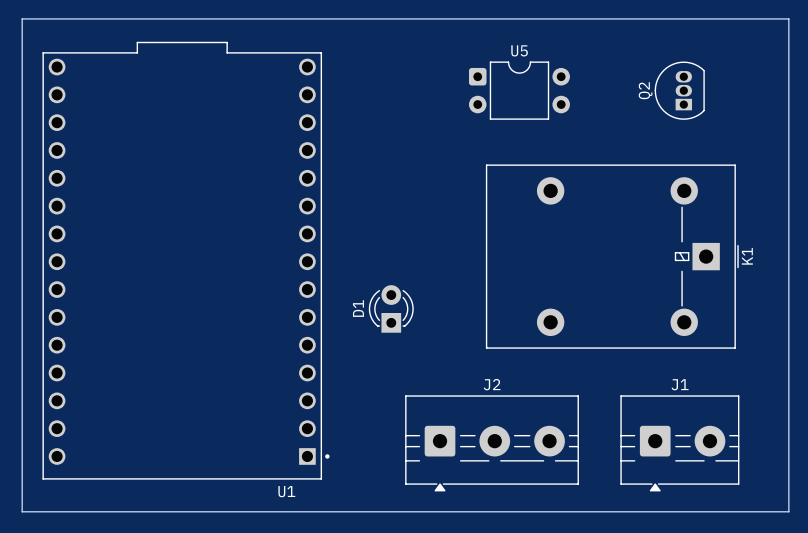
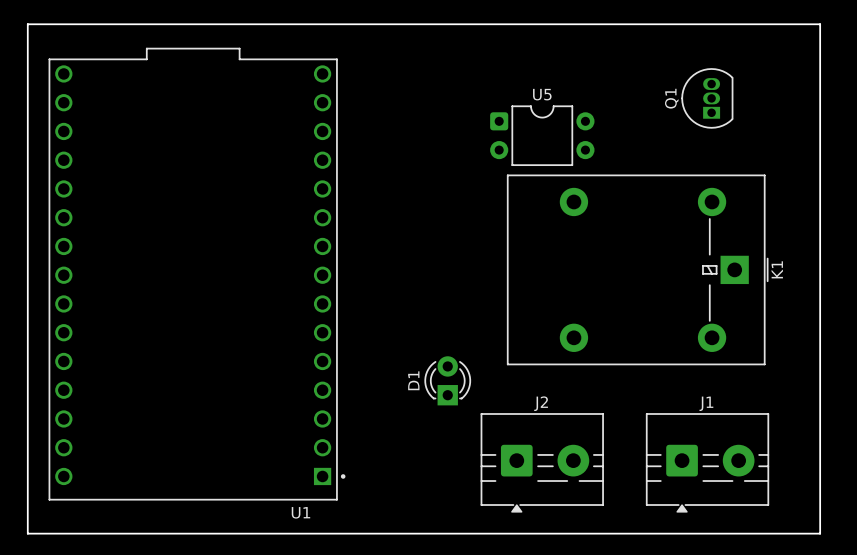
U5 position: (519, 90) -> (542, 135)
Q2 name: Q2 (645, 90) -> Q1 (671, 98)
D1 position: (391, 308) -> (447, 380)
J2 footprint: [405, 395, 579, 492] -> [480, 413, 604, 513]

